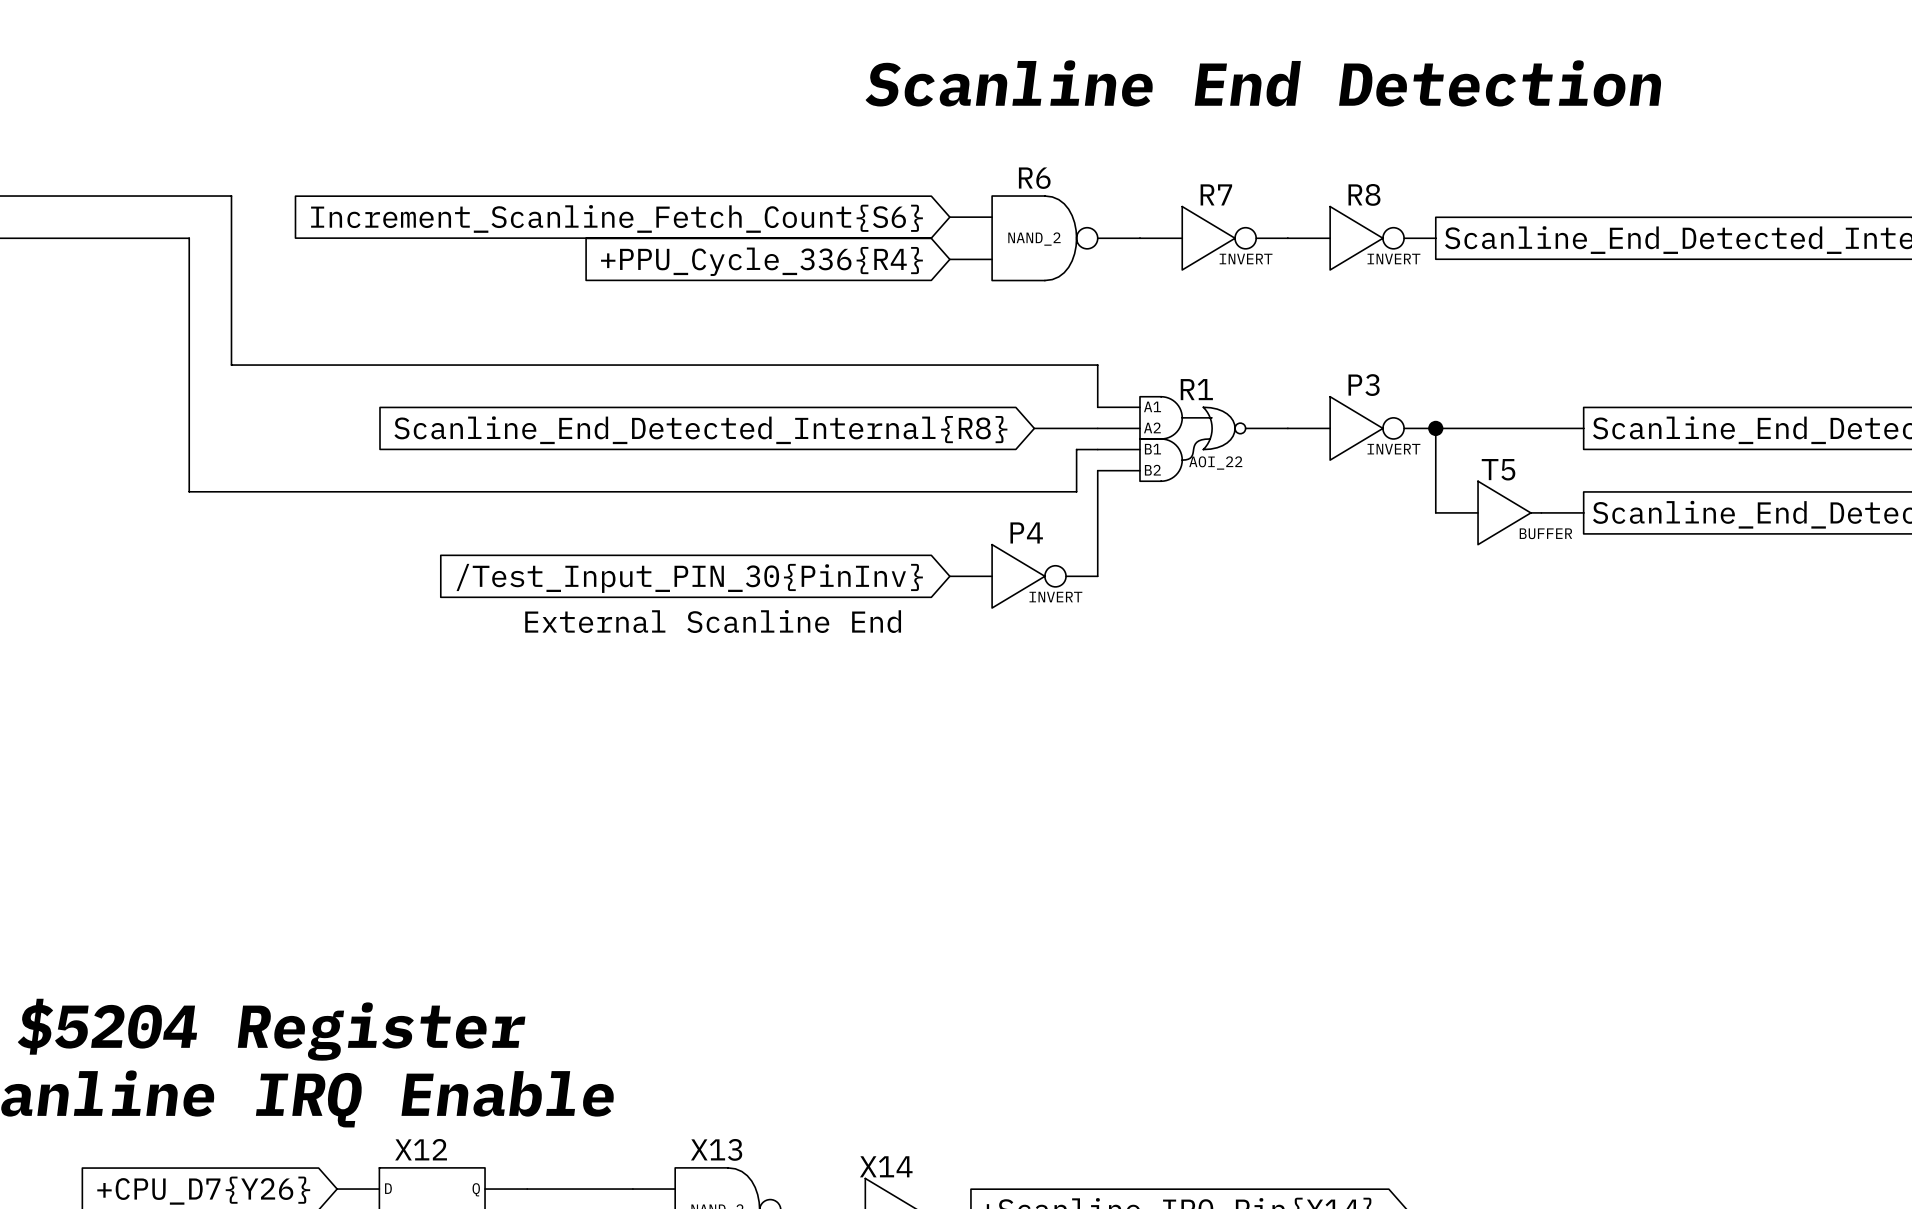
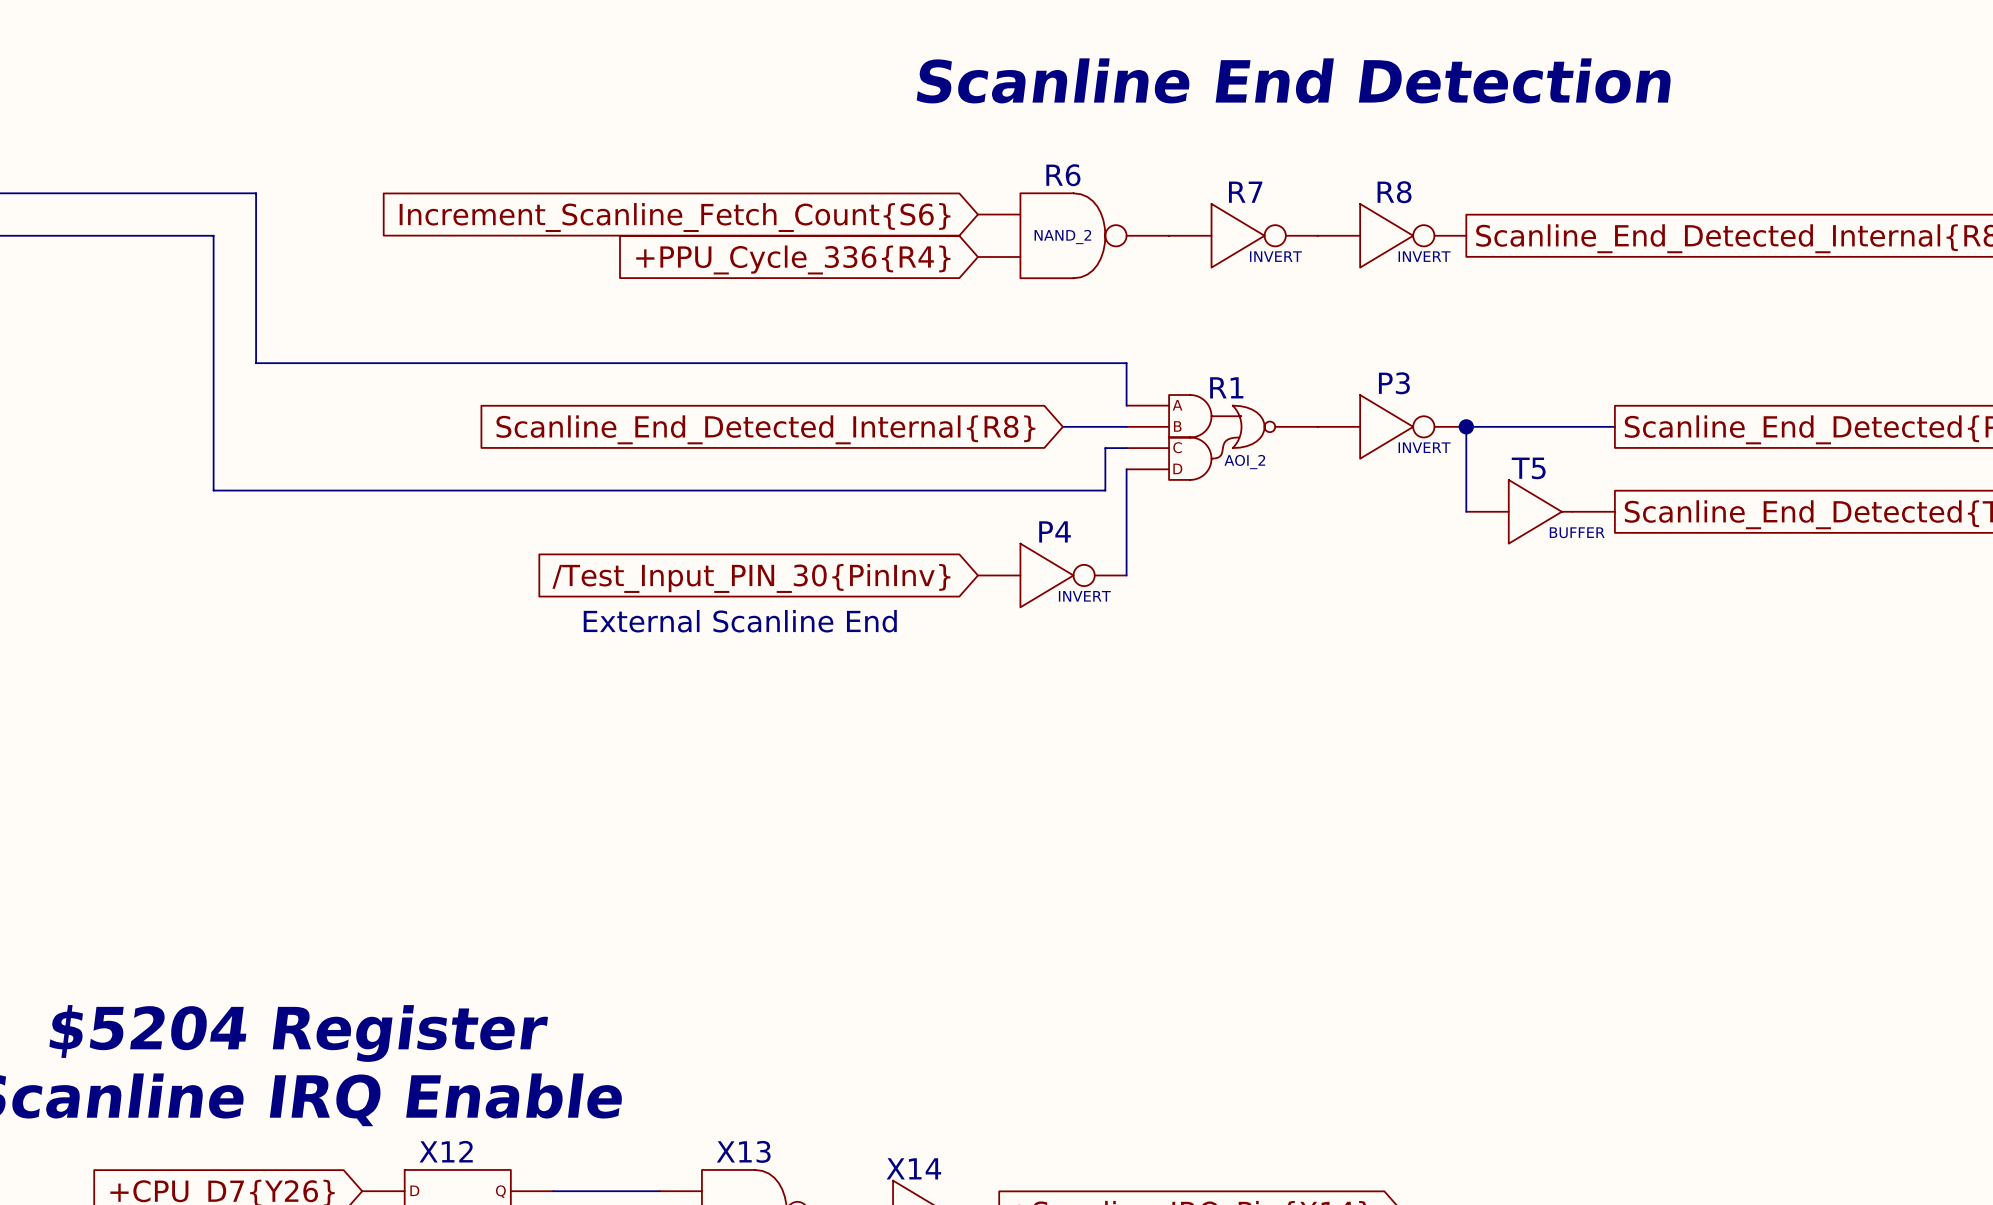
R1 text: none -> A (1177, 405)
R1 text: A1 (1152, 406) -> none
R1 text: A2 (1152, 427) -> none
R1 text: none -> B (1177, 426)
R1 text: none -> C (1177, 447)
R1 text: B1 (1152, 449) -> none
R1 value: AOI_22 (1215, 463) -> AOI_2 (1244, 462)
R1 text: none -> D (1177, 468)
R1 text: B2 (1152, 470) -> none

